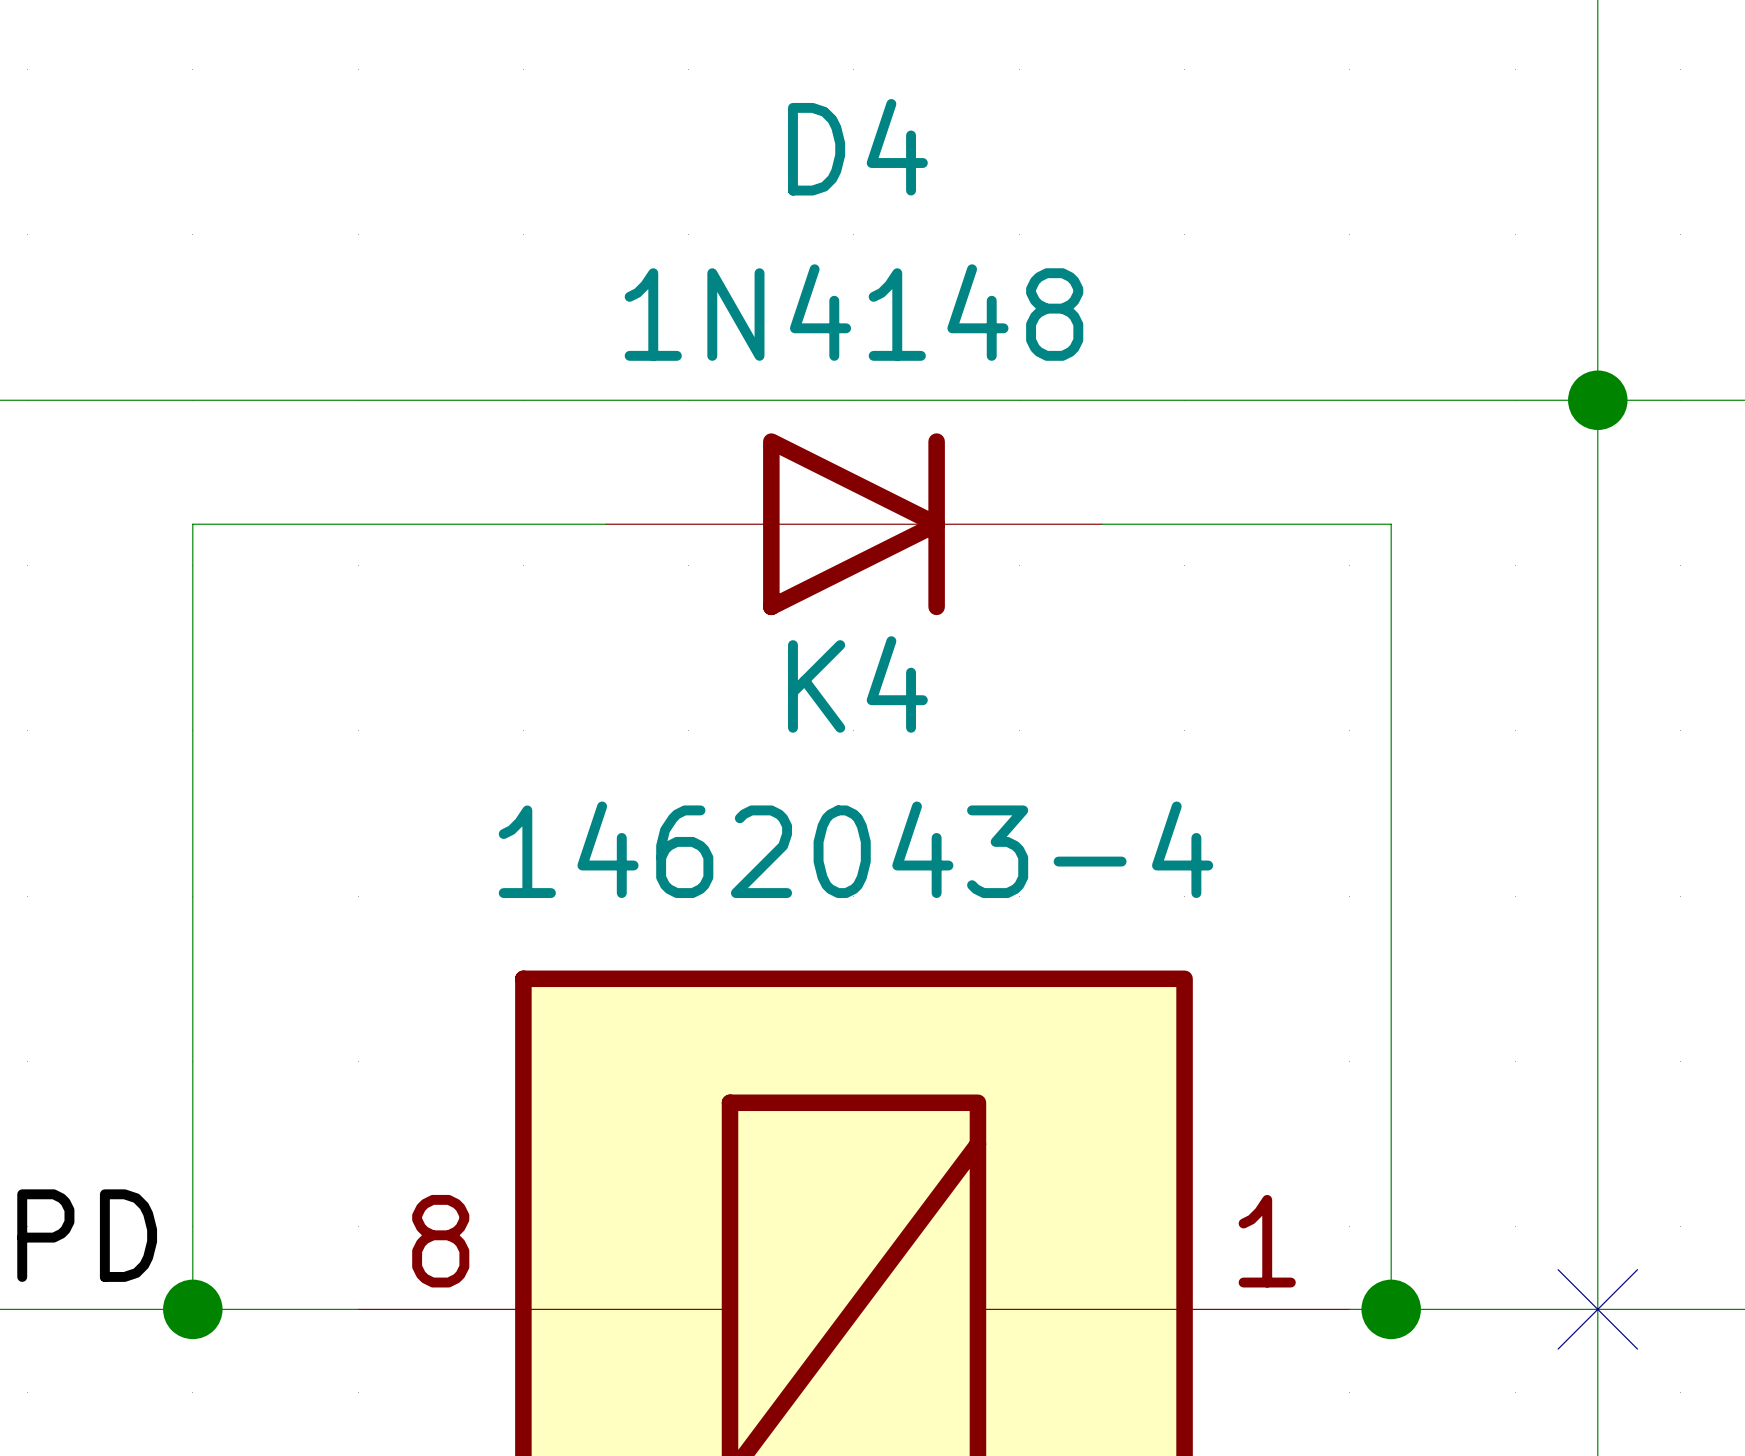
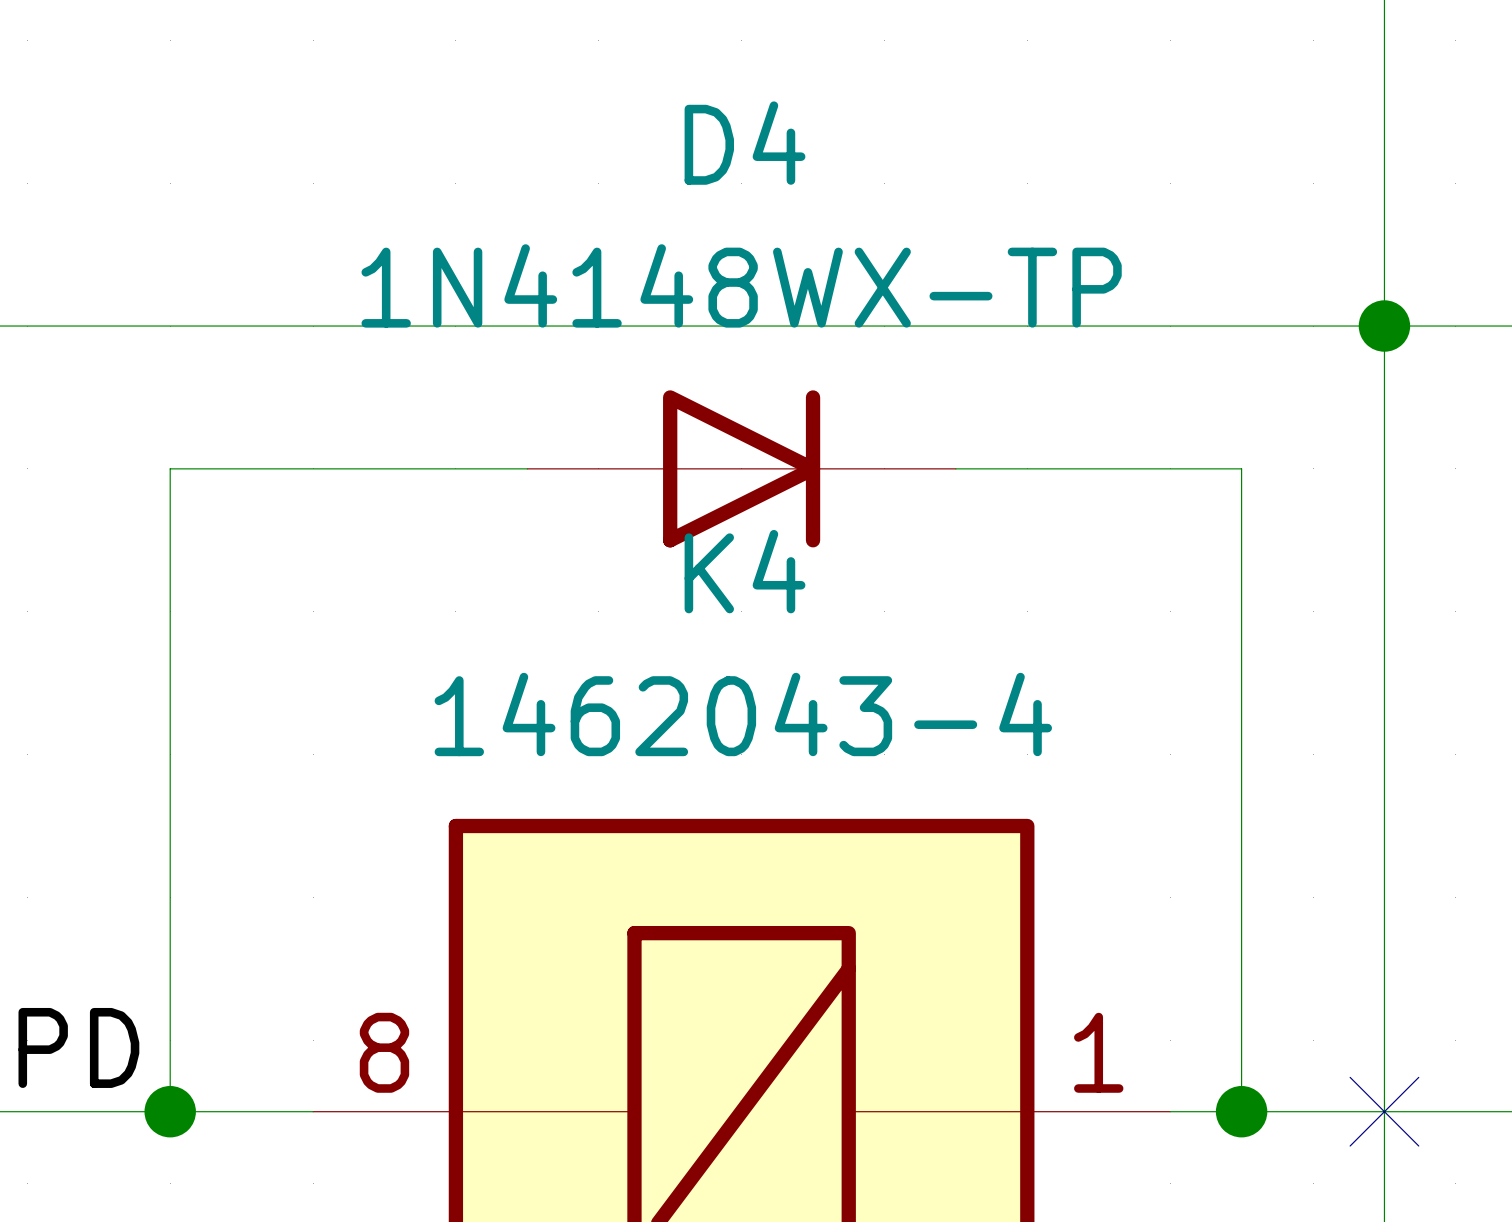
D4 value: 1N4148 (853, 312) -> 1N4148WX-TP (741, 285)
wire: (606, 524) (192, 524) (192, 565) -> (527, 468) (170, 468)
D4 position: (853, 524) -> (741, 468)
wire: (1101, 524) (1391, 524) (1391, 1309) -> none
wire: none -> (955, 468) (1241, 468) (1241, 1111)
junction position: (1391, 1309) -> (1241, 1111)

